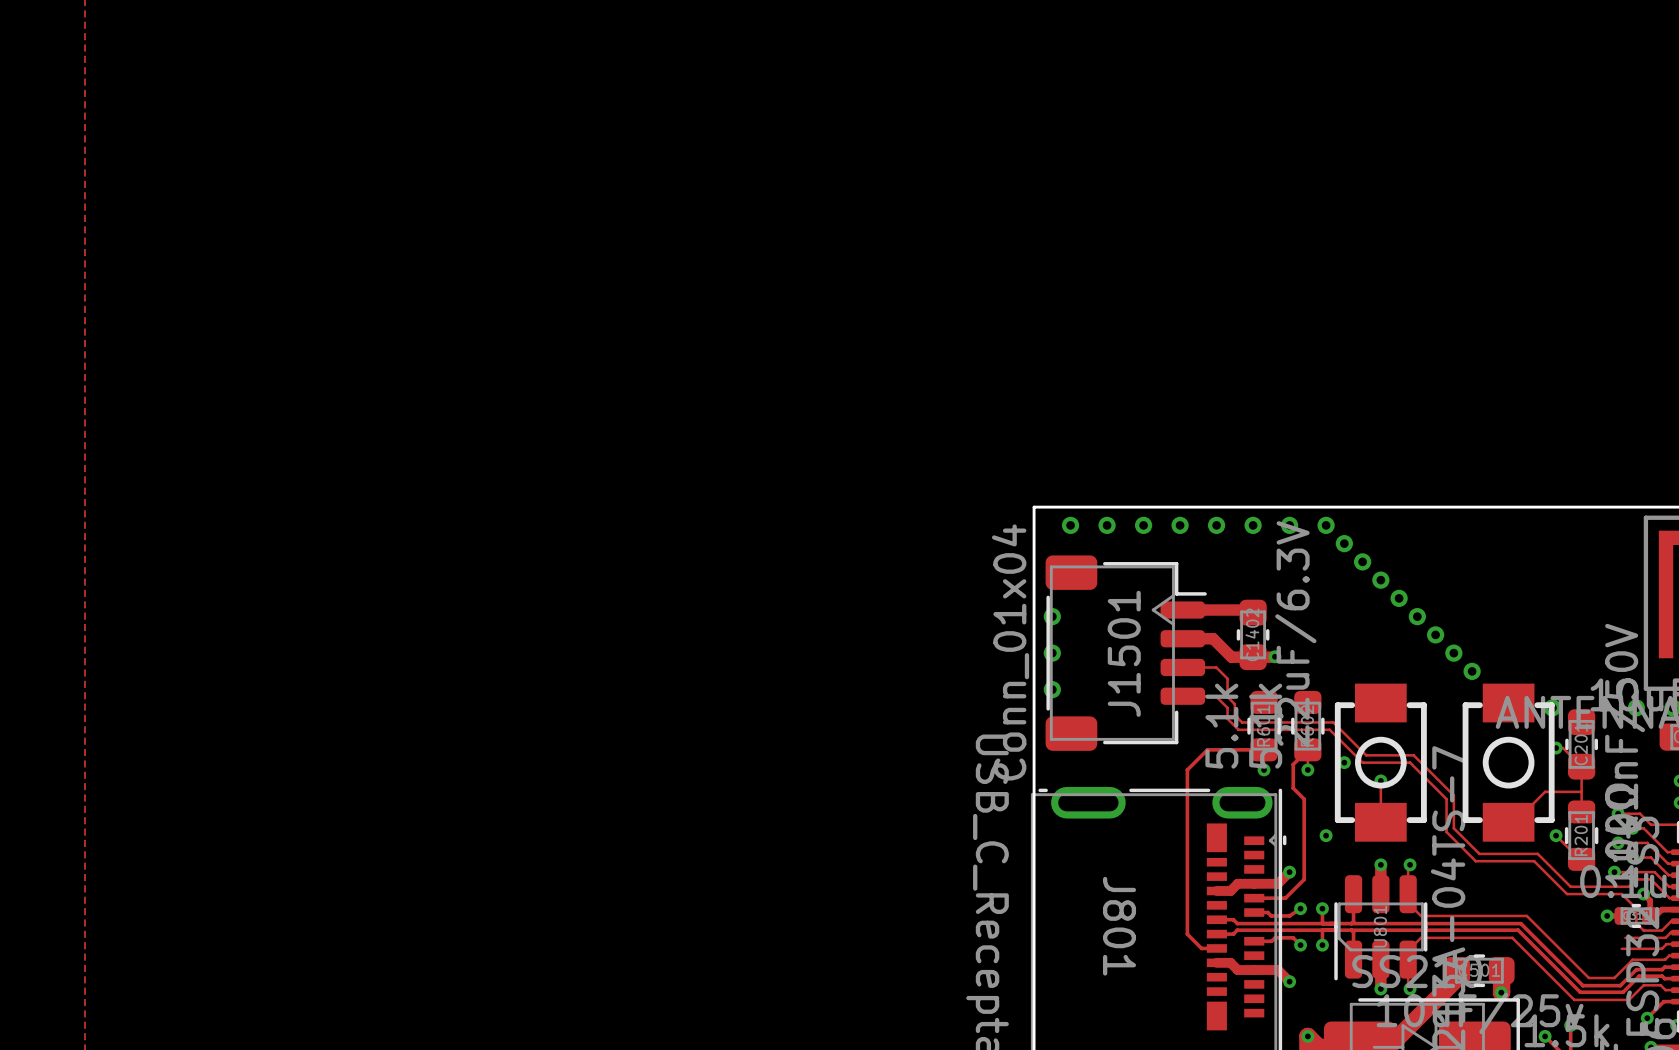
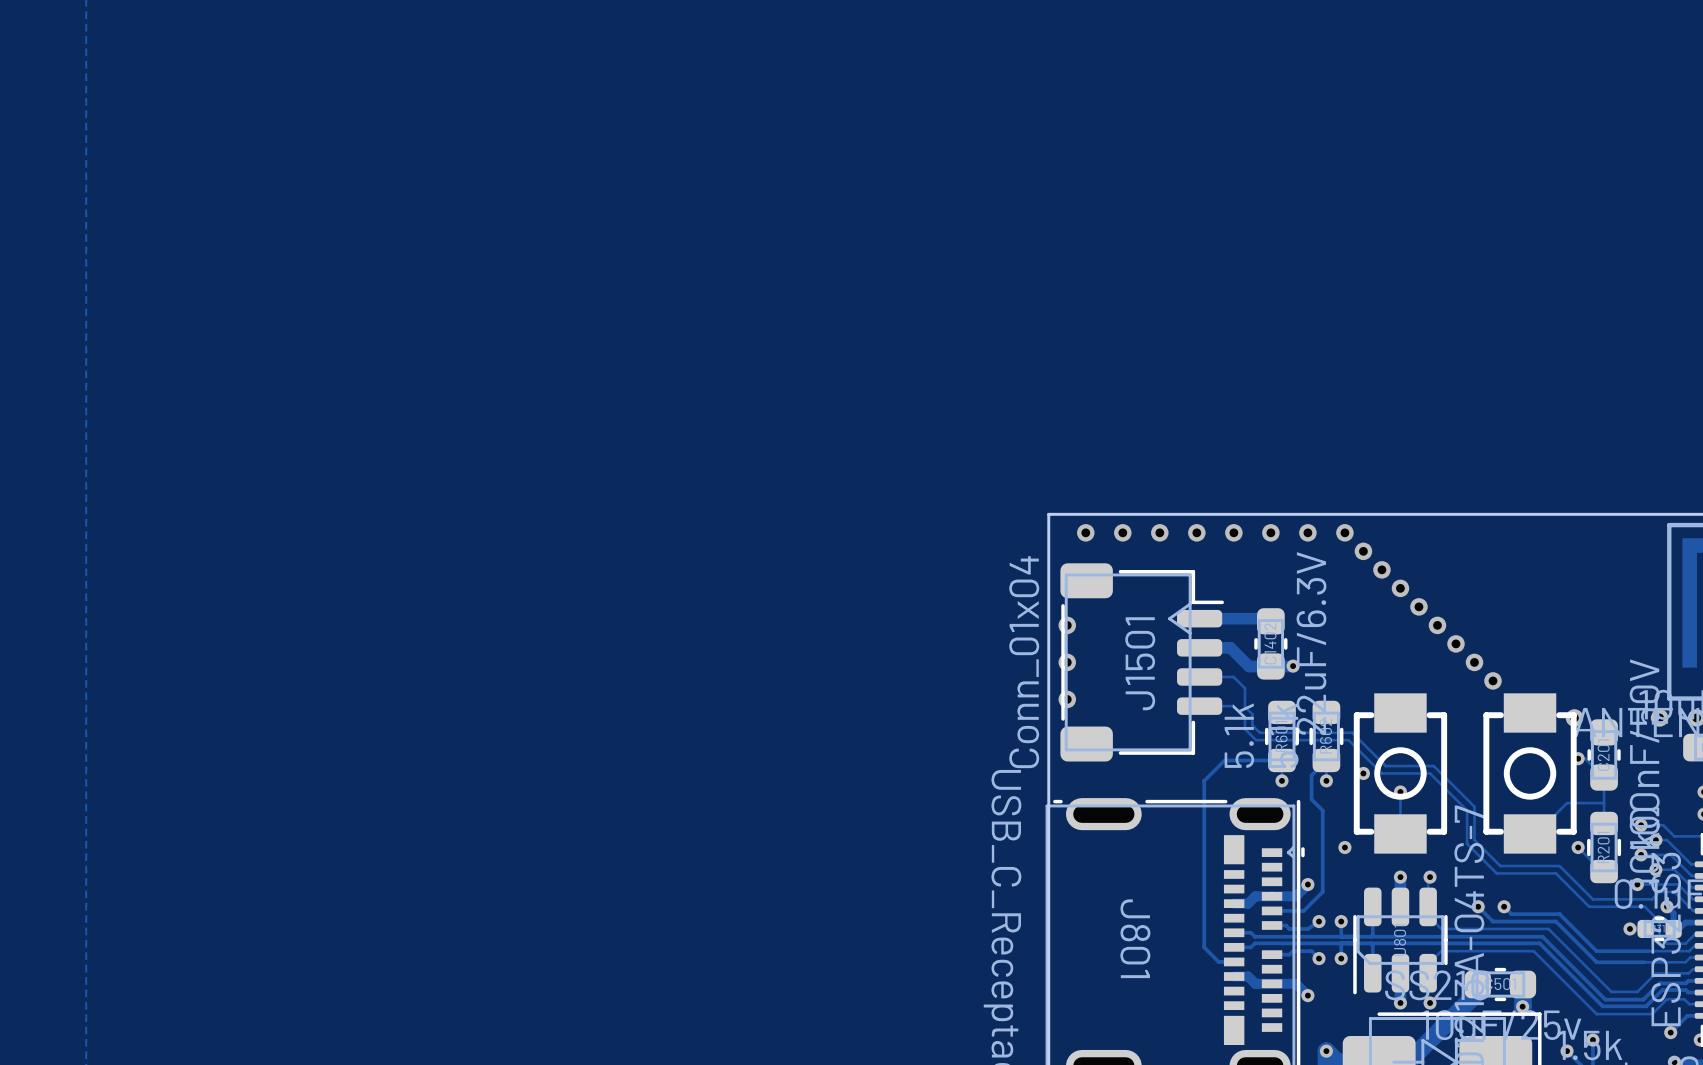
track: none -> (1478, 906) (1493, 921) (1555, 921) (1596, 962) (1644, 962)
via: none -> (1478, 906)
track: none -> (1504, 906) (1511, 914) (1559, 914) (1596, 951) (1648, 951)
via: none -> (1504, 906)

